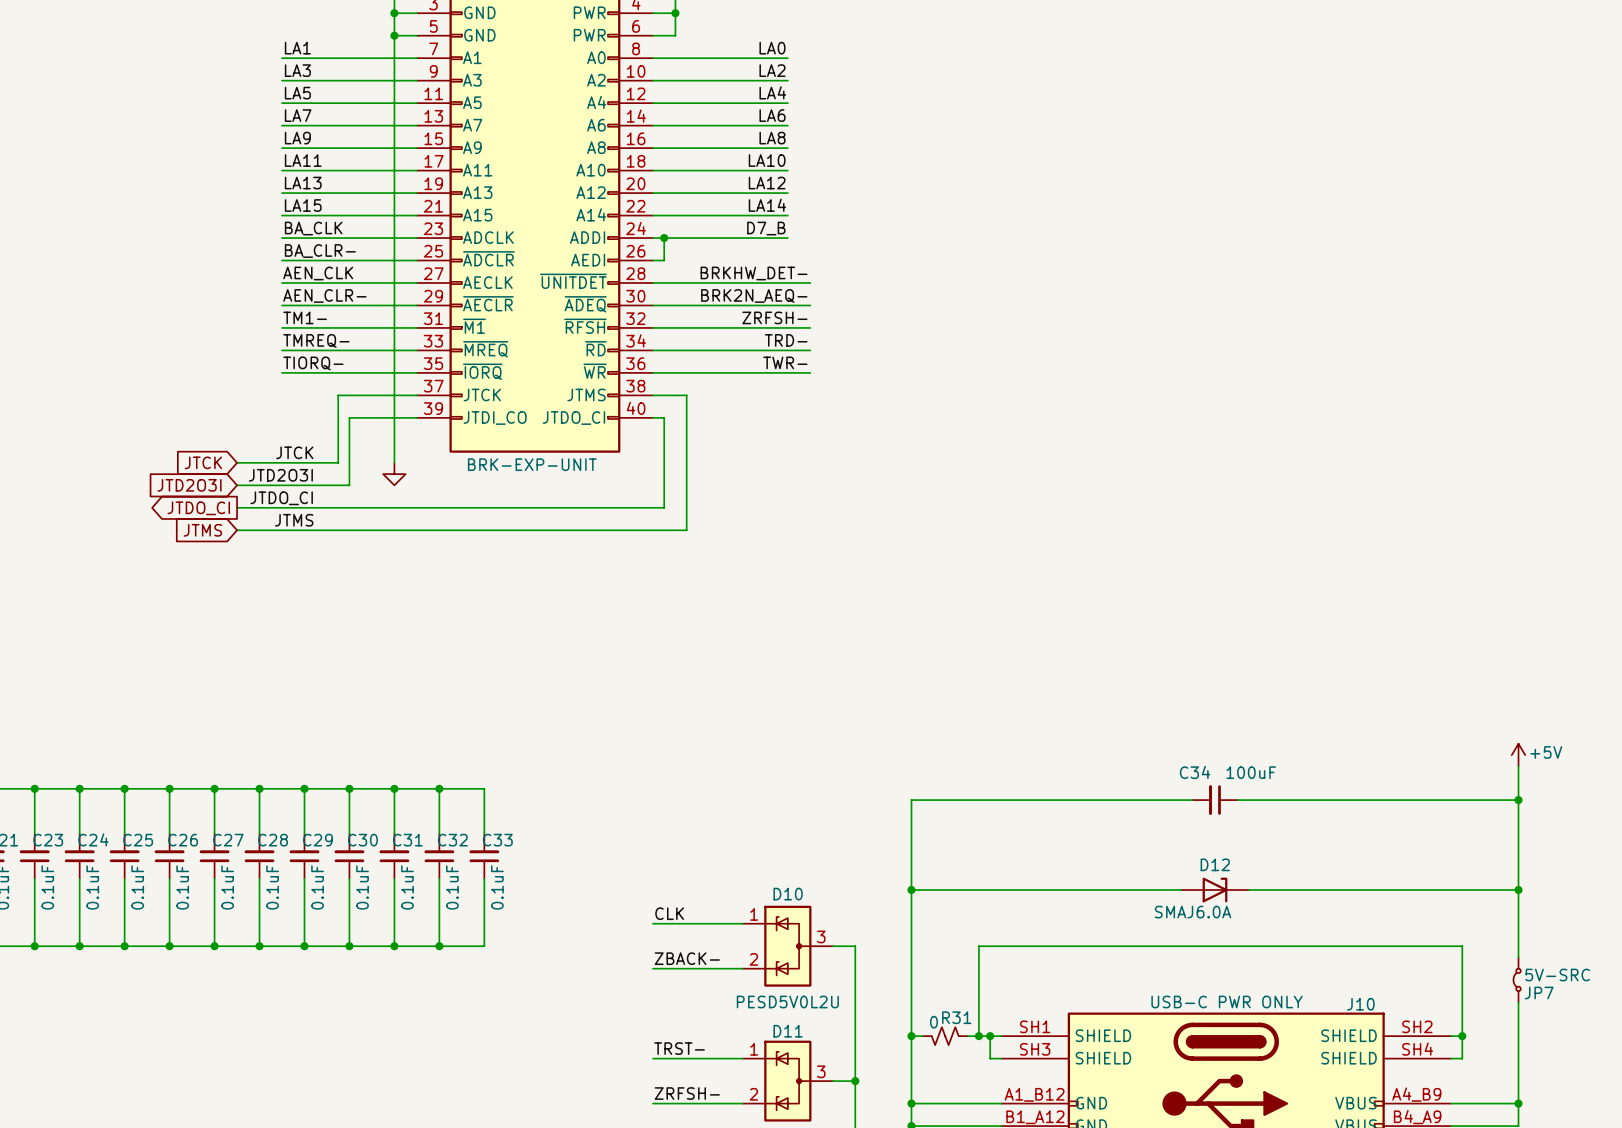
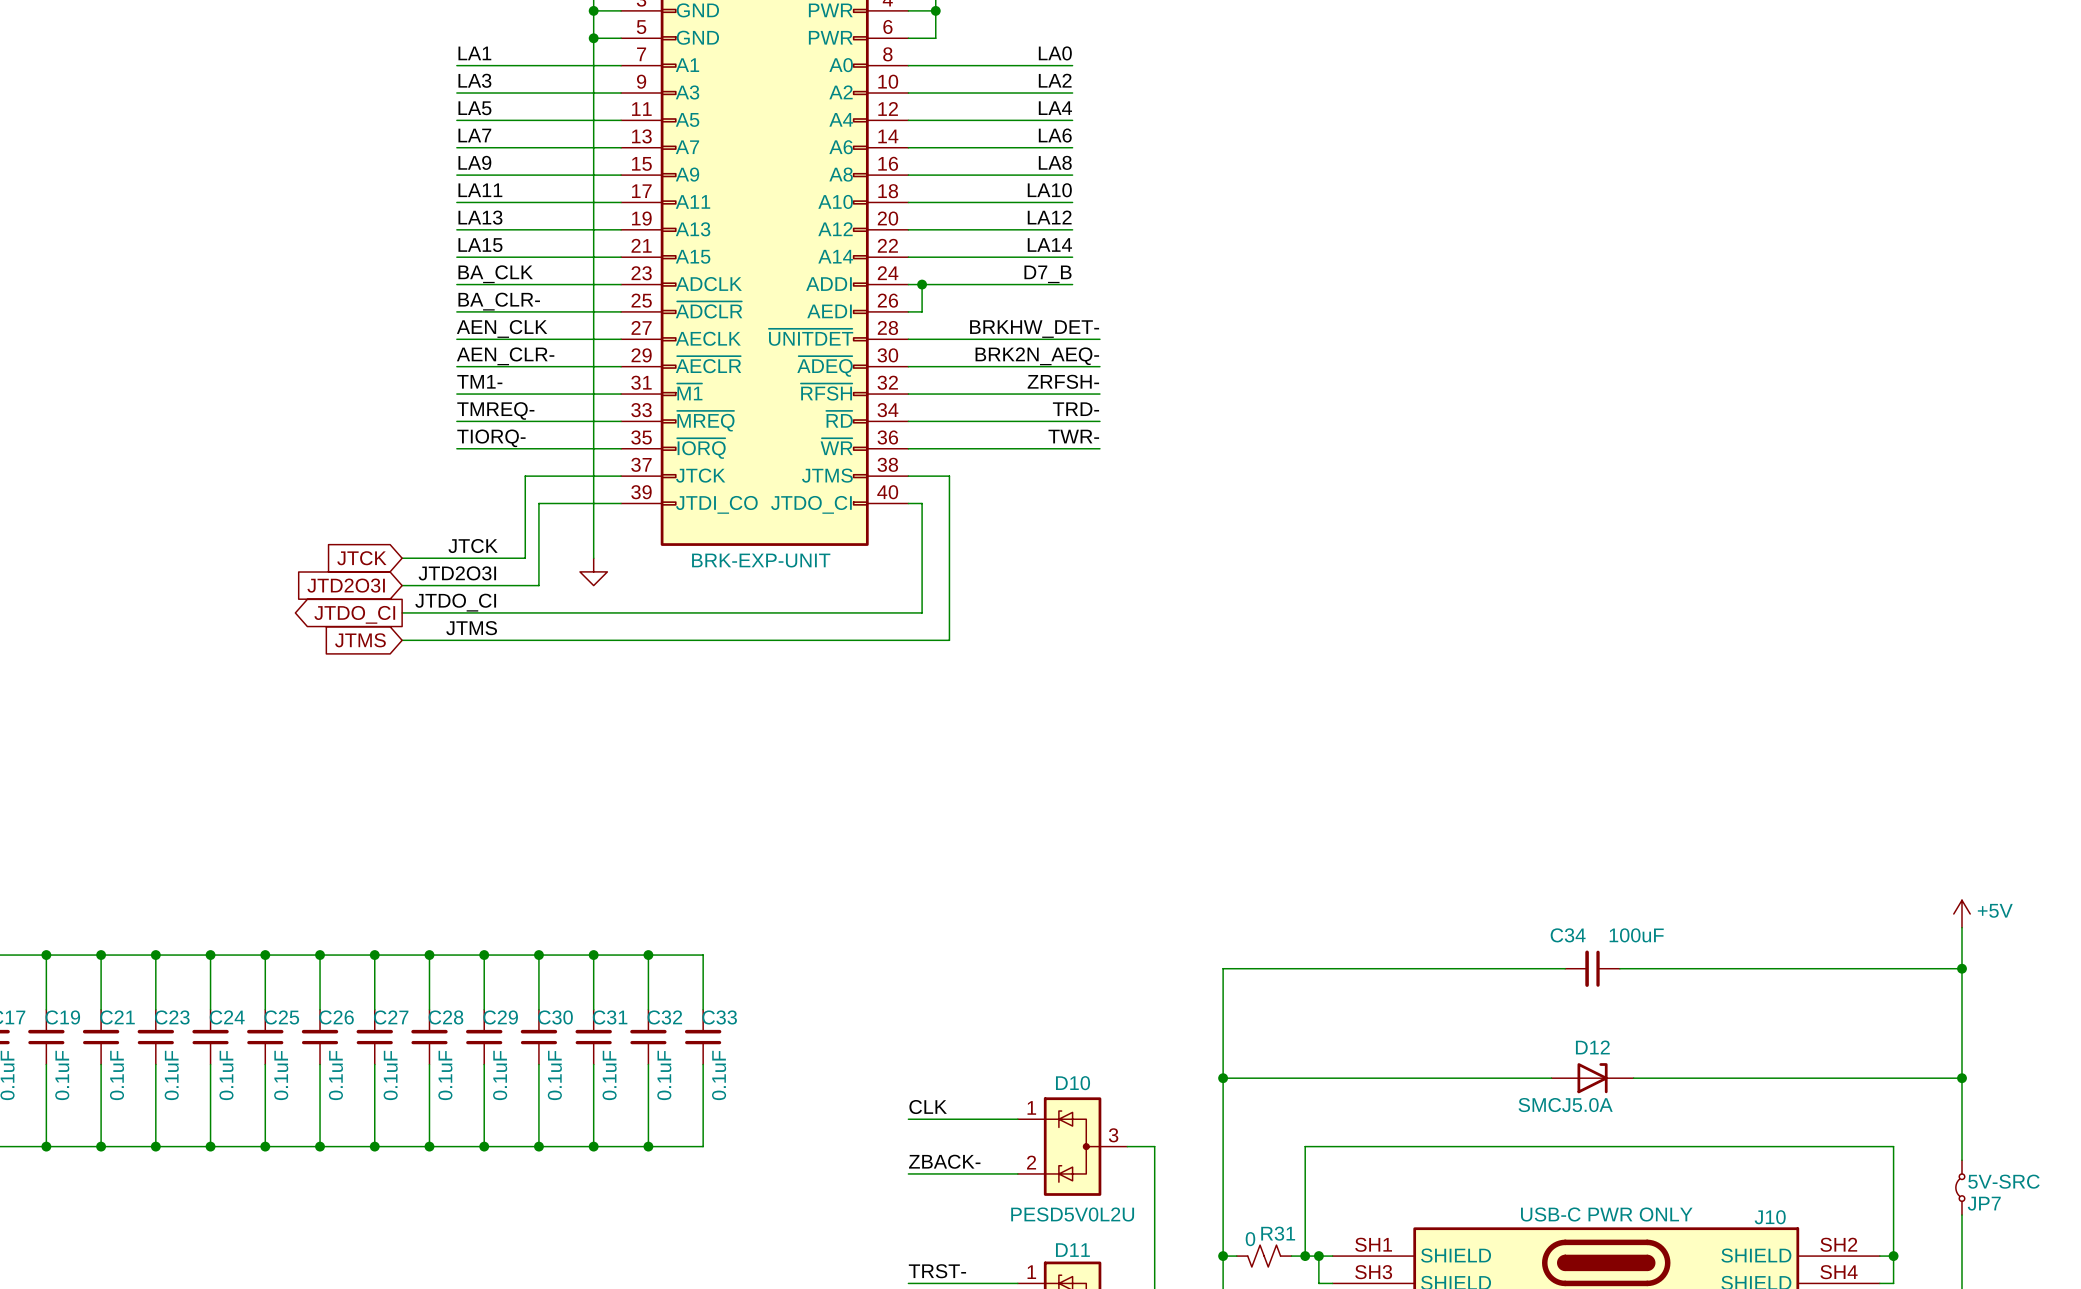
D12 value: SMAJ6.0A (1193, 912) -> SMCJ5.0A (1565, 1105)

